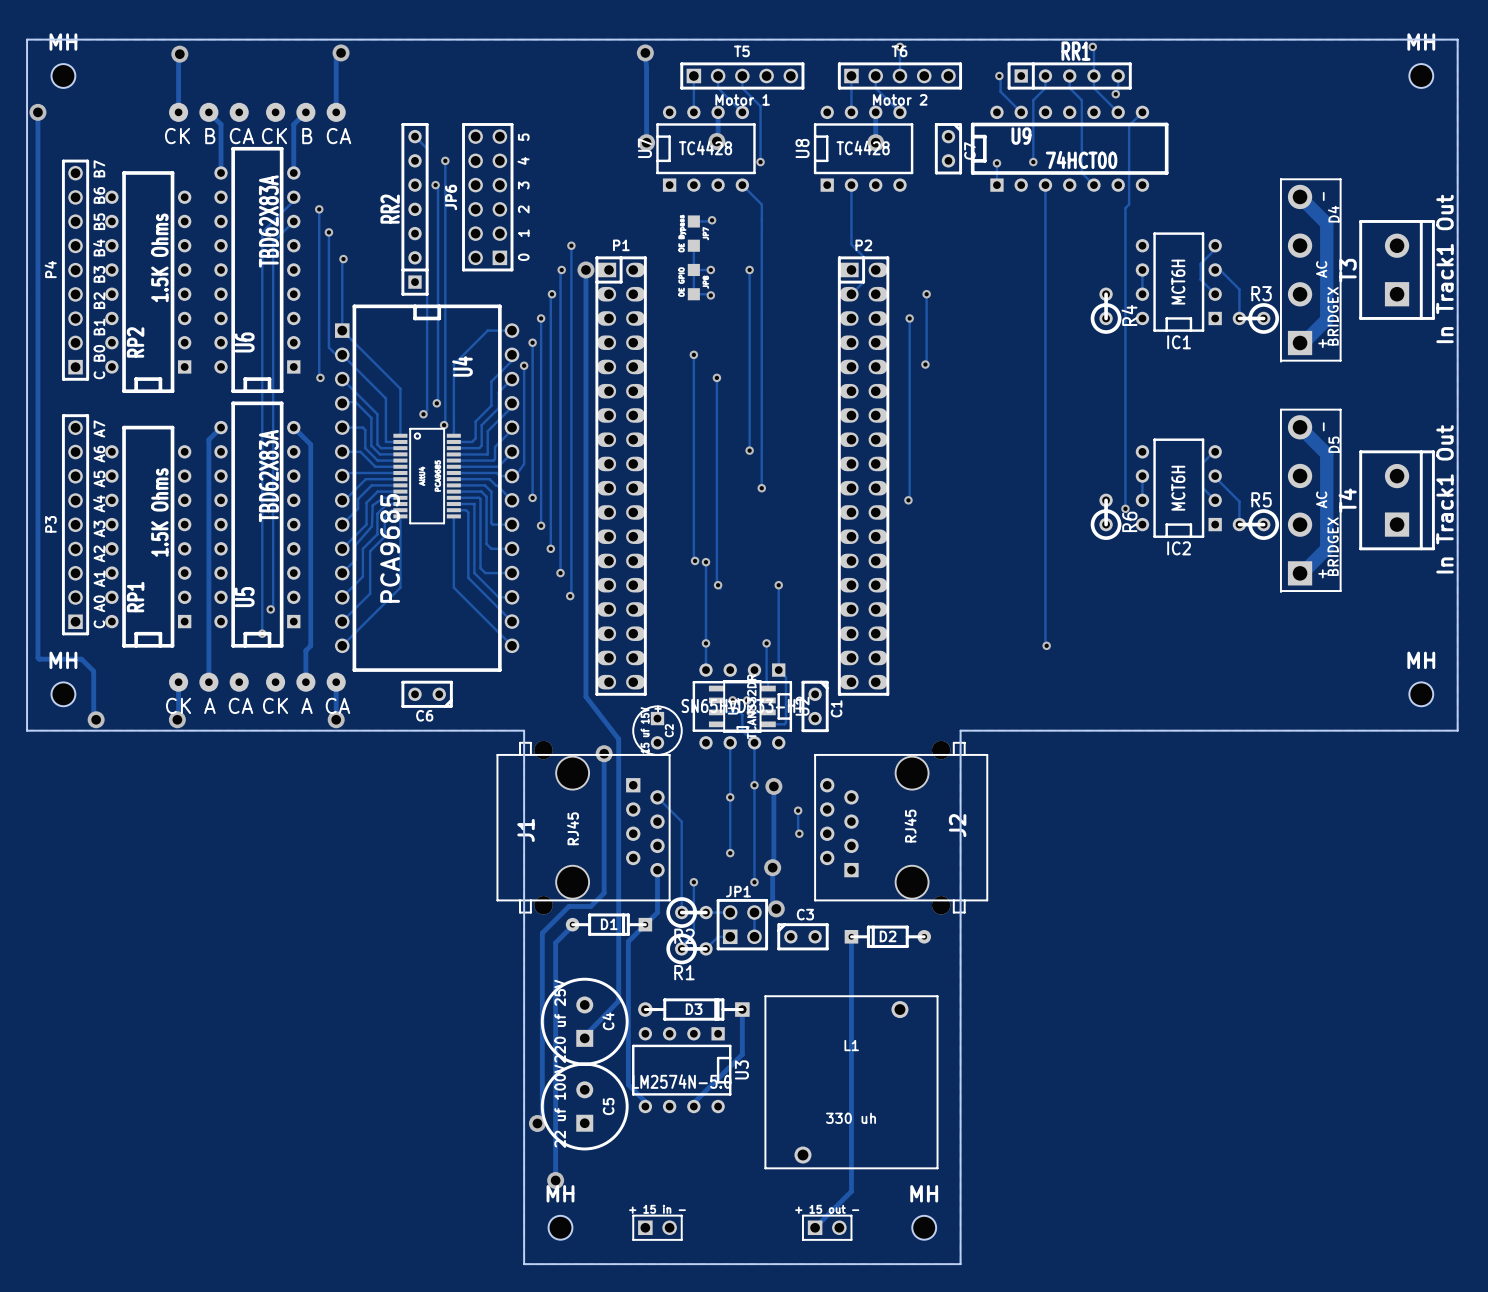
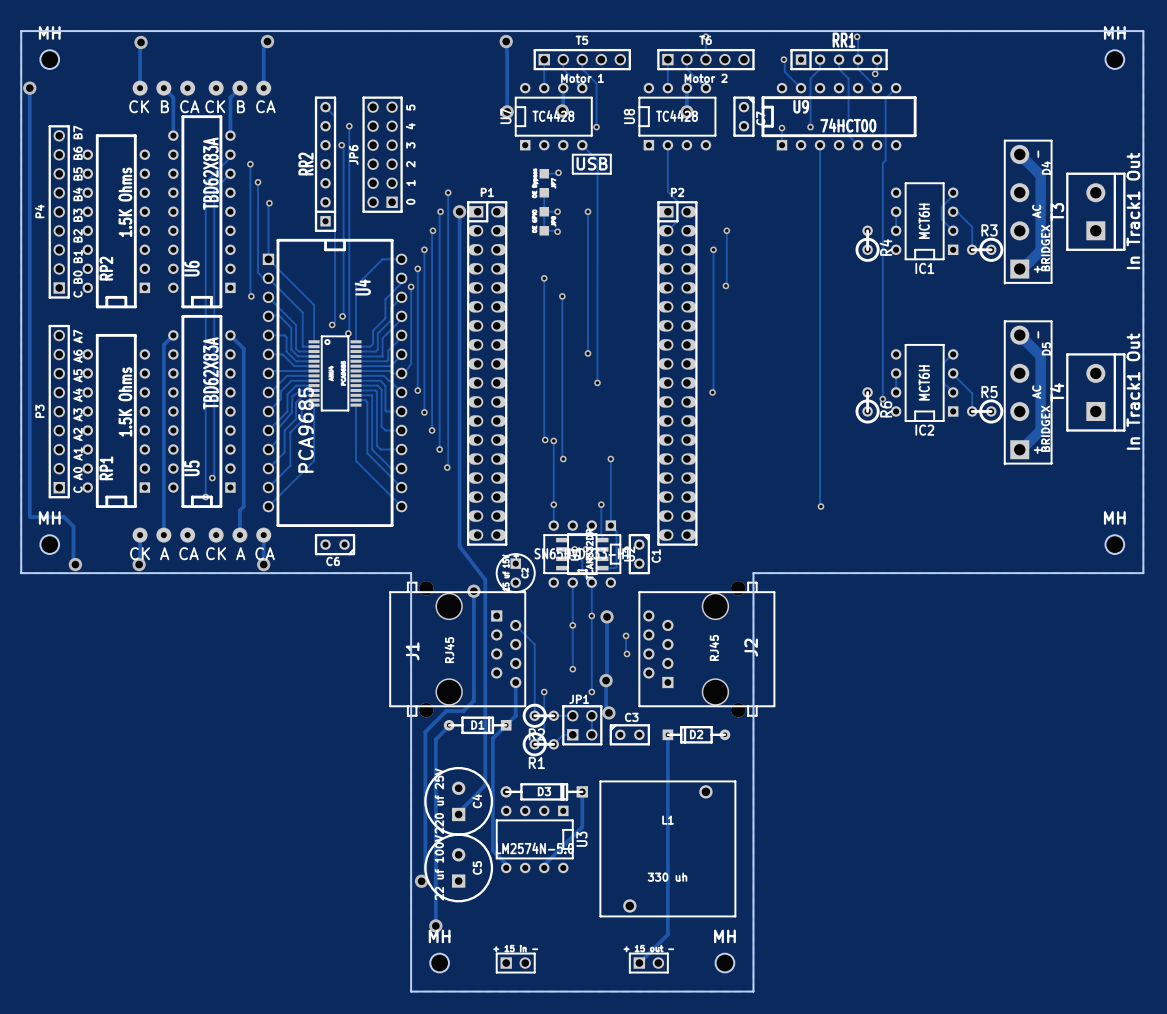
line: none -> (572, 154) (610, 154) (610, 173) (572, 173) (572, 154)
text: none -> USB (592, 163)

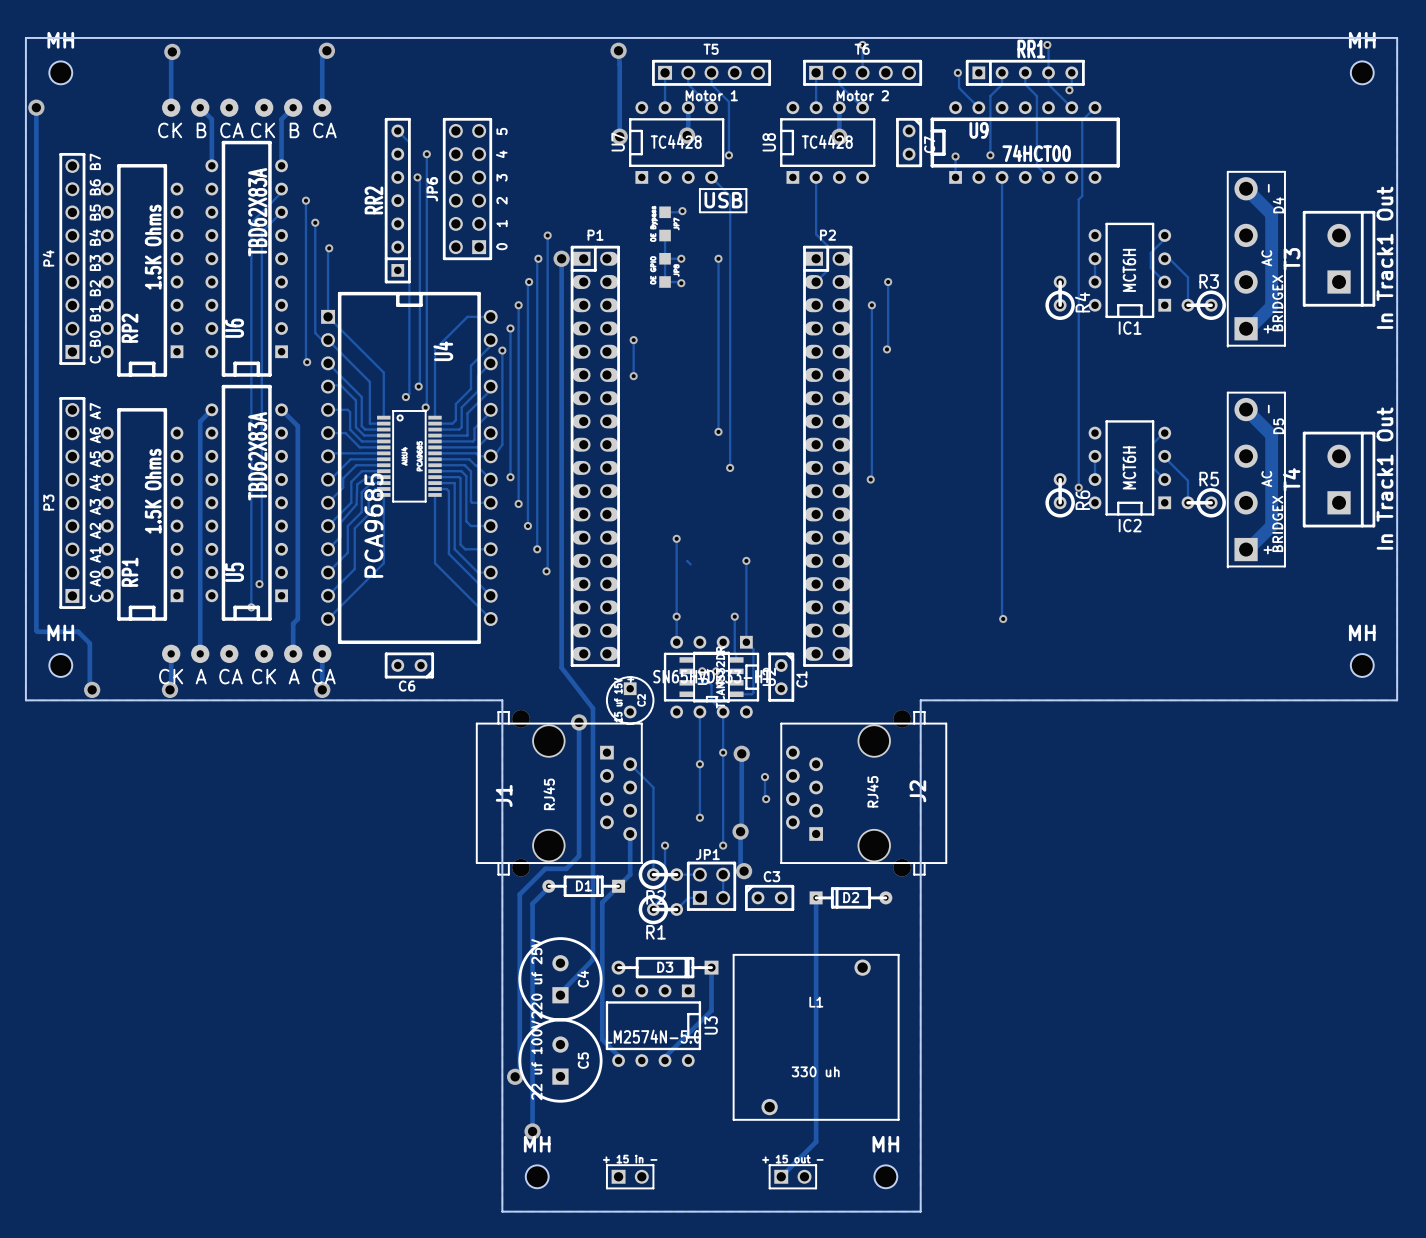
track: none -> (633, 340) (633, 376)
via: none -> (633, 340)
track: (544, 278) (545, 440) -> none
via: (544, 278) -> none
track: (562, 296) (562, 459) -> none
via: (562, 296) -> none
via: none -> (633, 376)
via: (545, 440) -> none
via: (563, 459) -> none

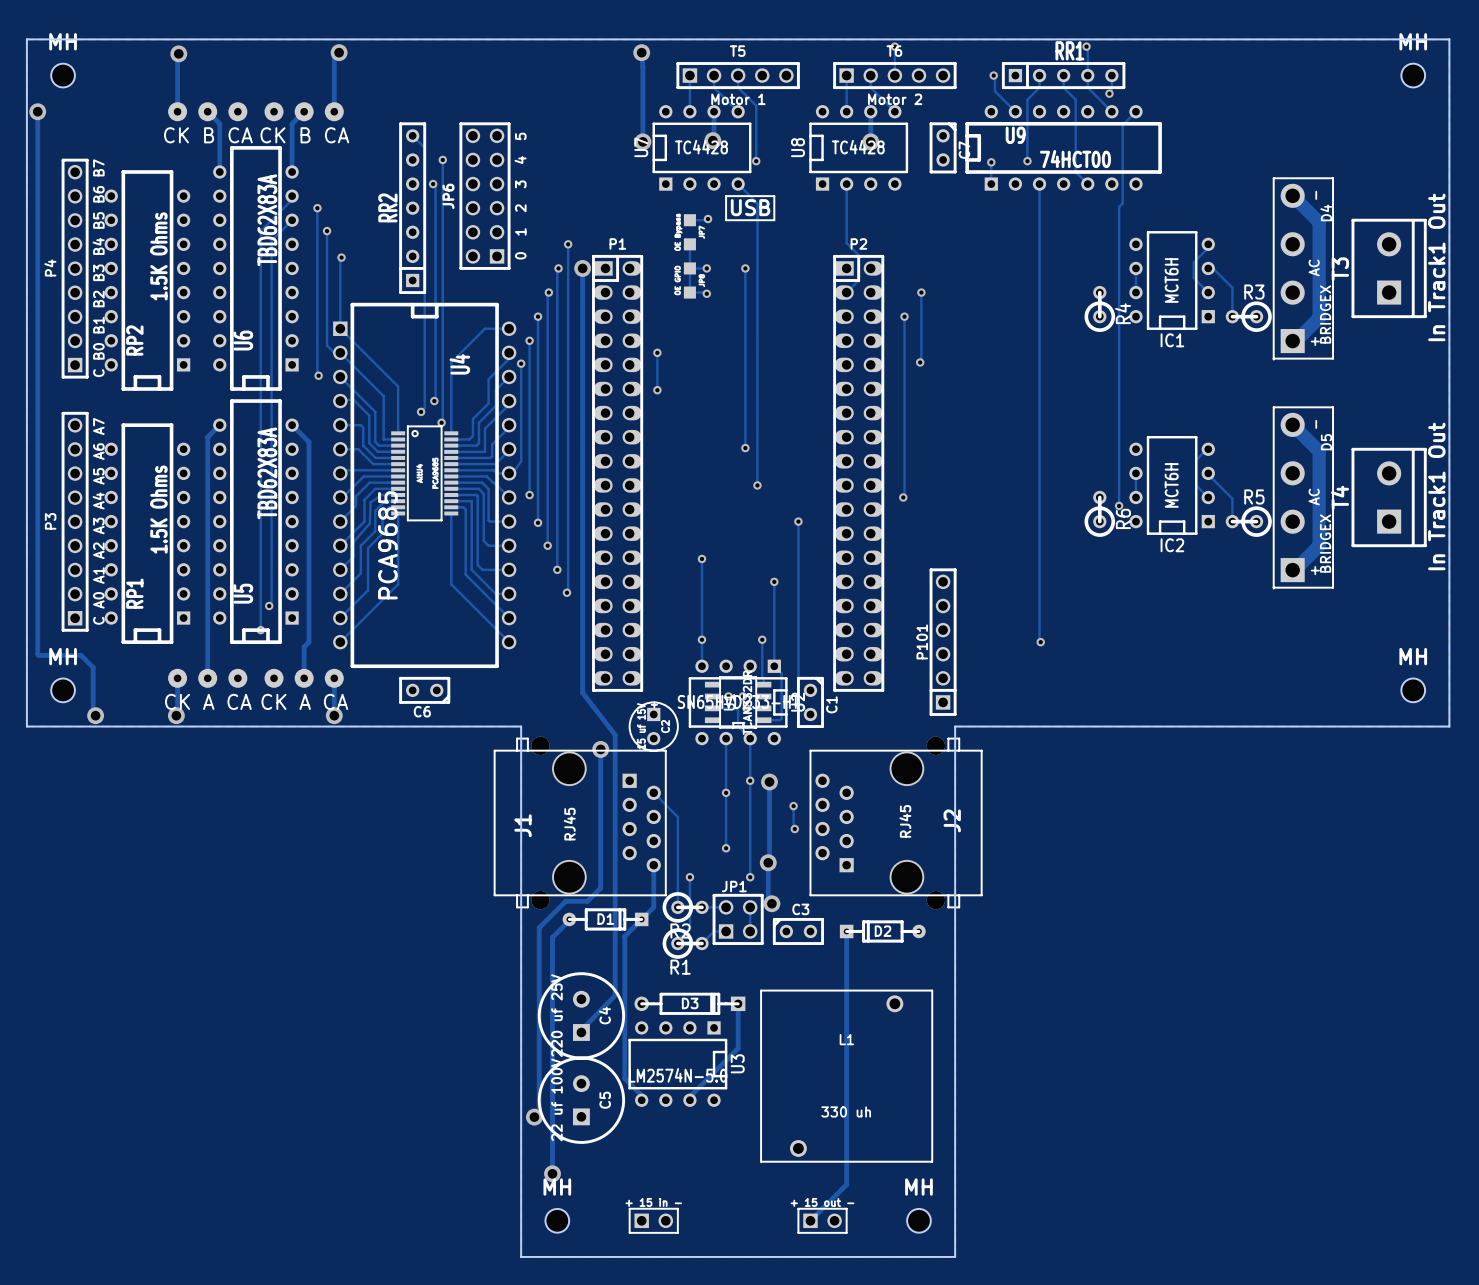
track: none -> (798, 521) (798, 702) (810, 714)
via: none -> (798, 521)
track: (687, 560) (690, 564) -> none
P101: none -> (943, 642)

